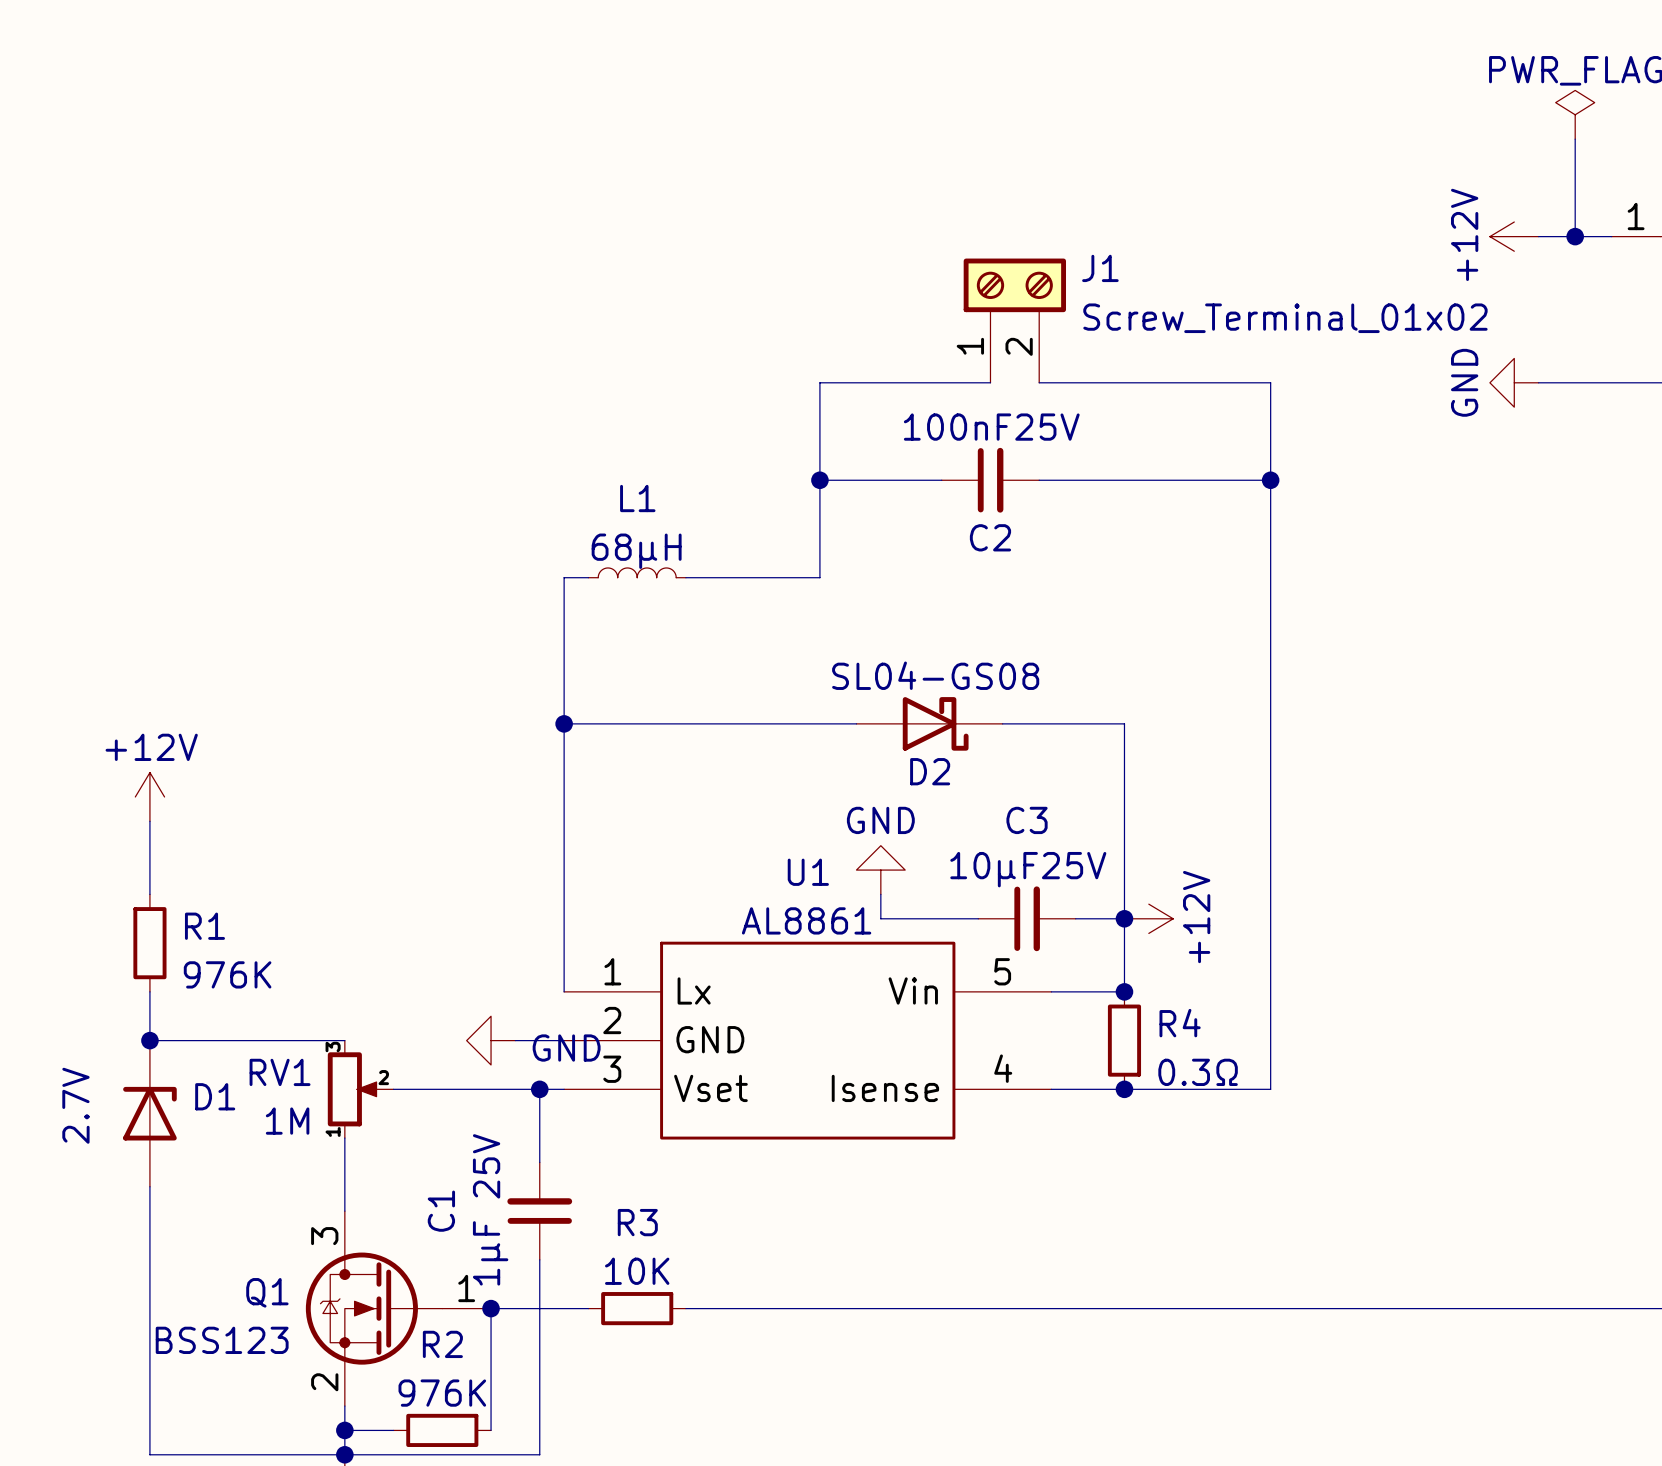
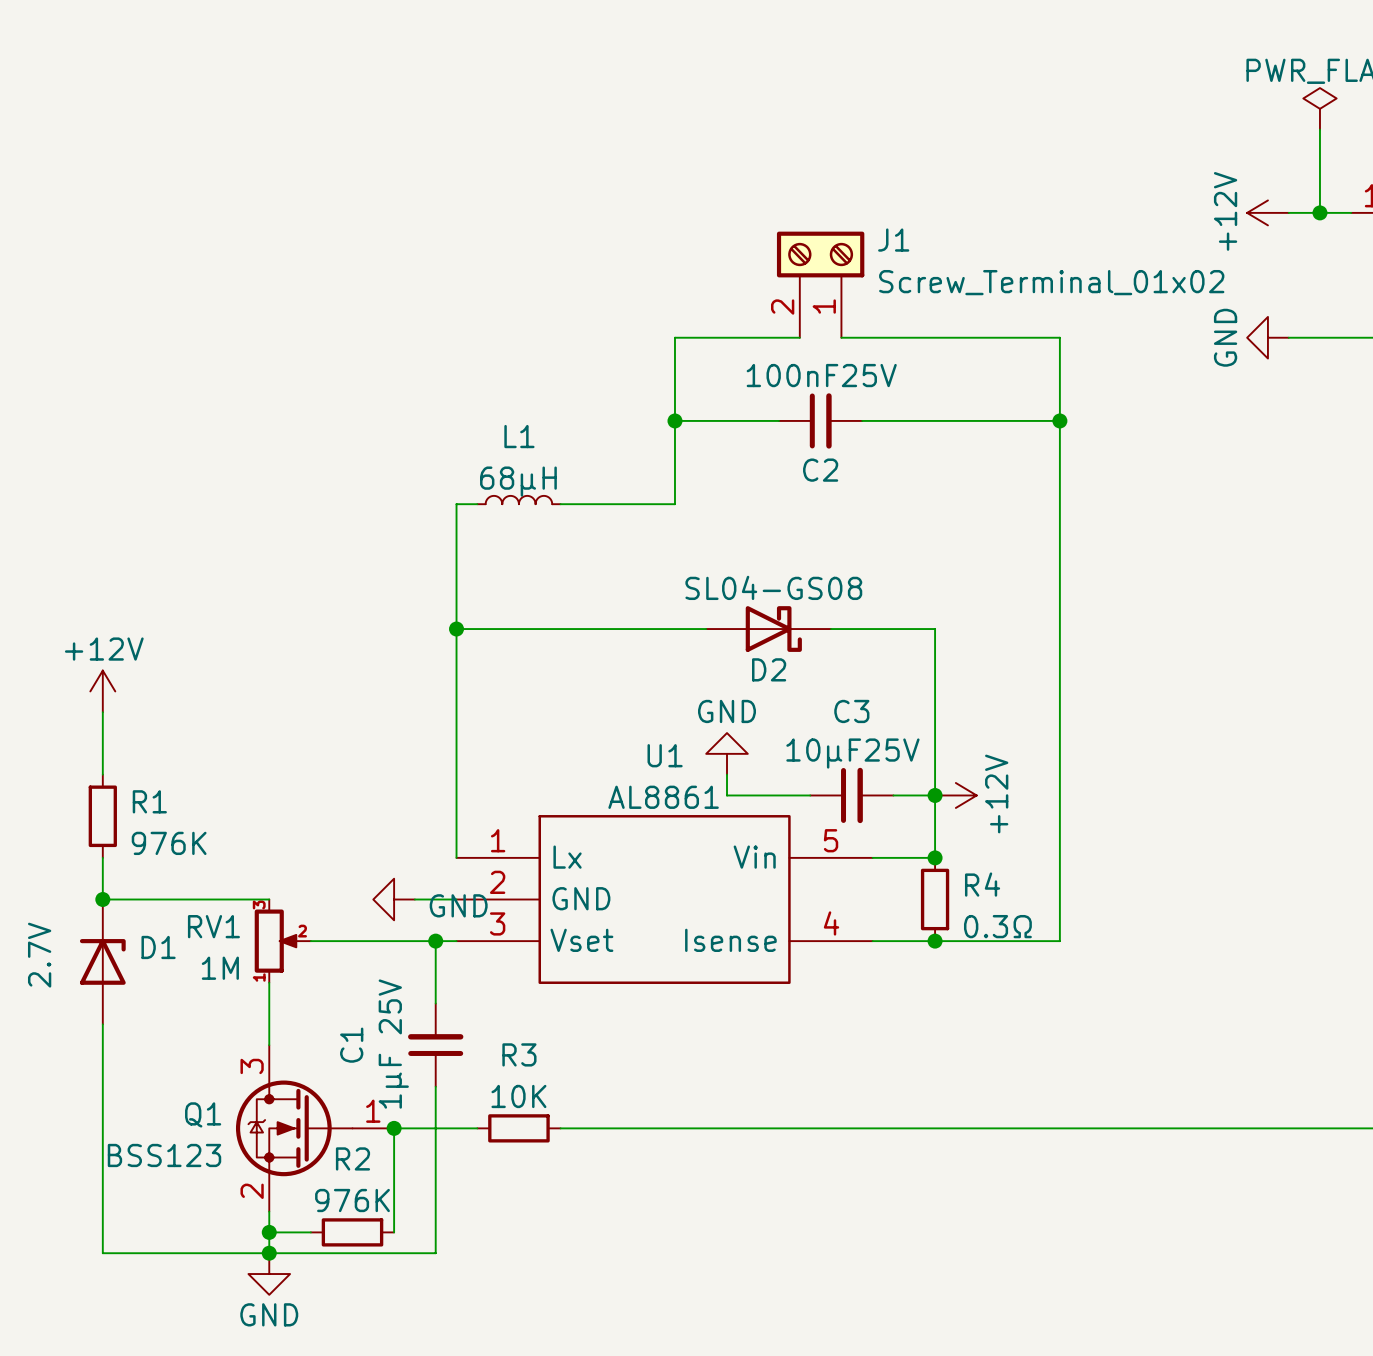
J1 flip: as is (1014, 285) -> left-right (820, 254)
wire: (966, 382) (990, 382) -> (841, 337) (862, 337)

